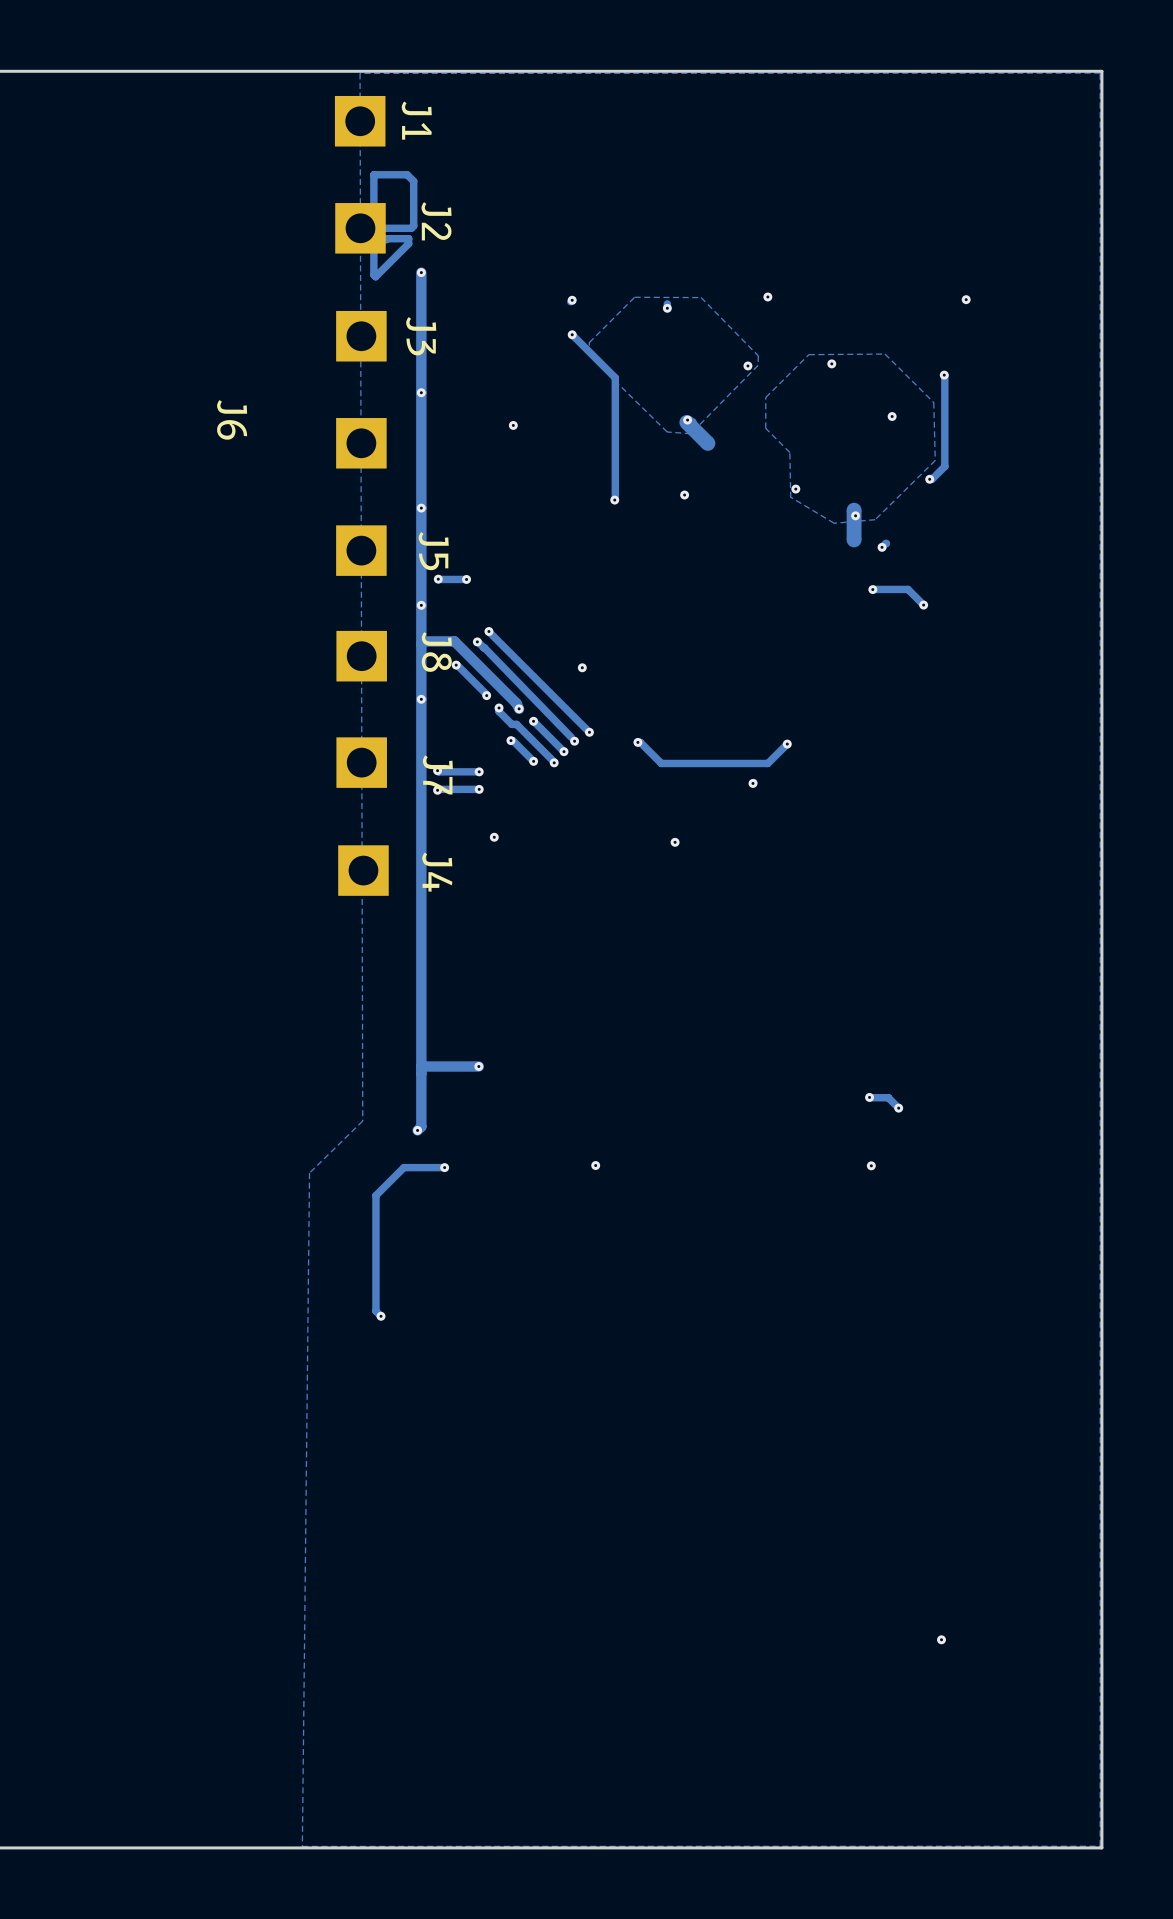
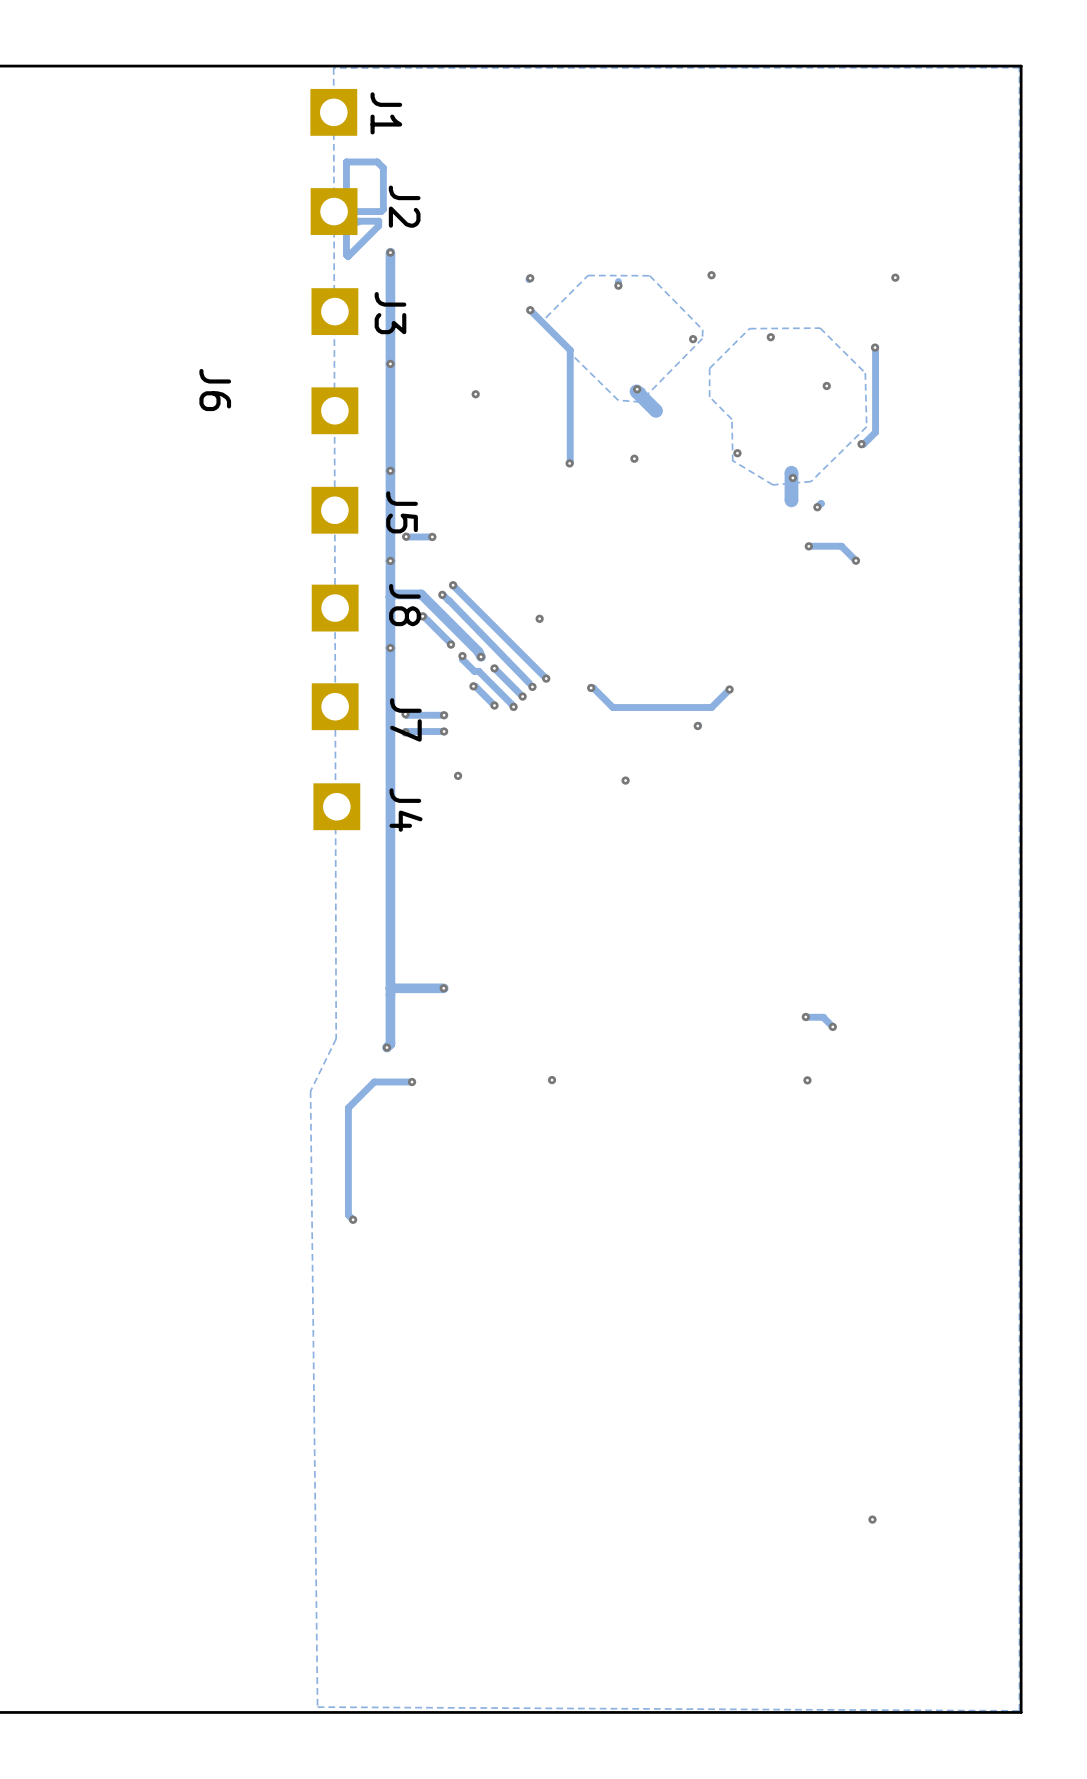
zone outline: (362, 1121) (309, 1173) (302, 1846) (1100, 1846) -> (336, 1038) (310, 1091) (317, 1707) (1019, 1710)

